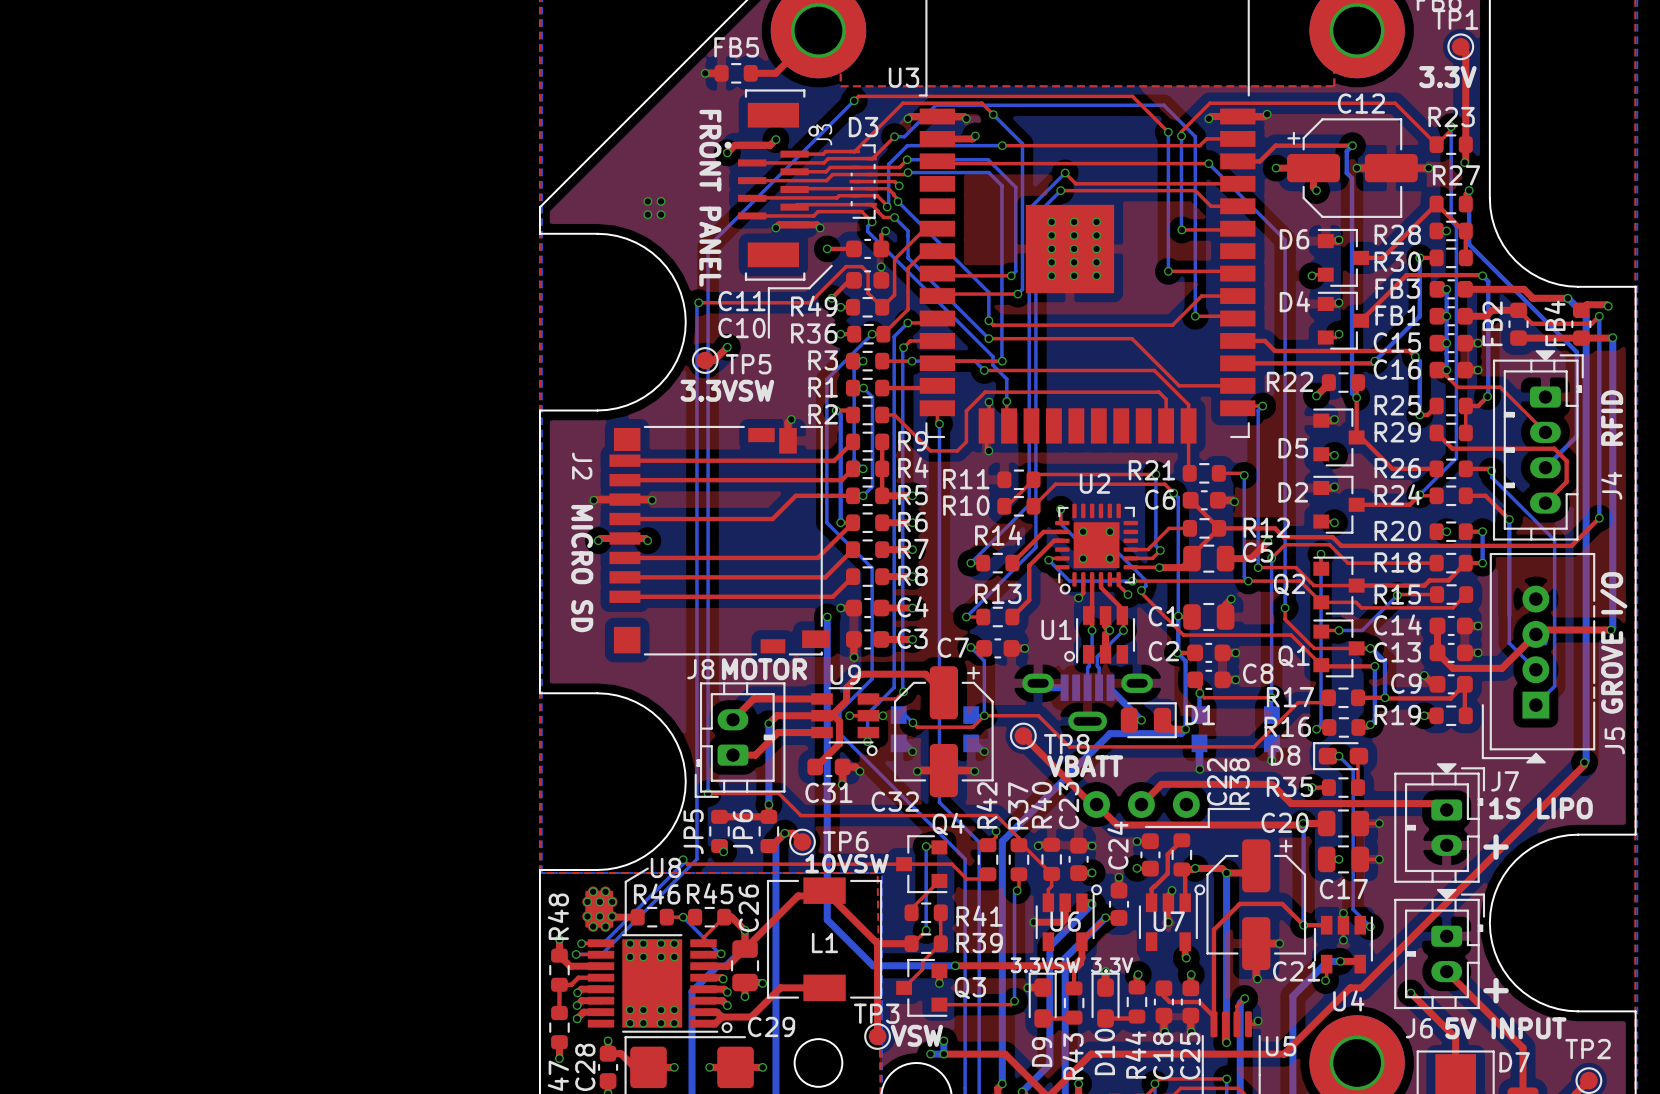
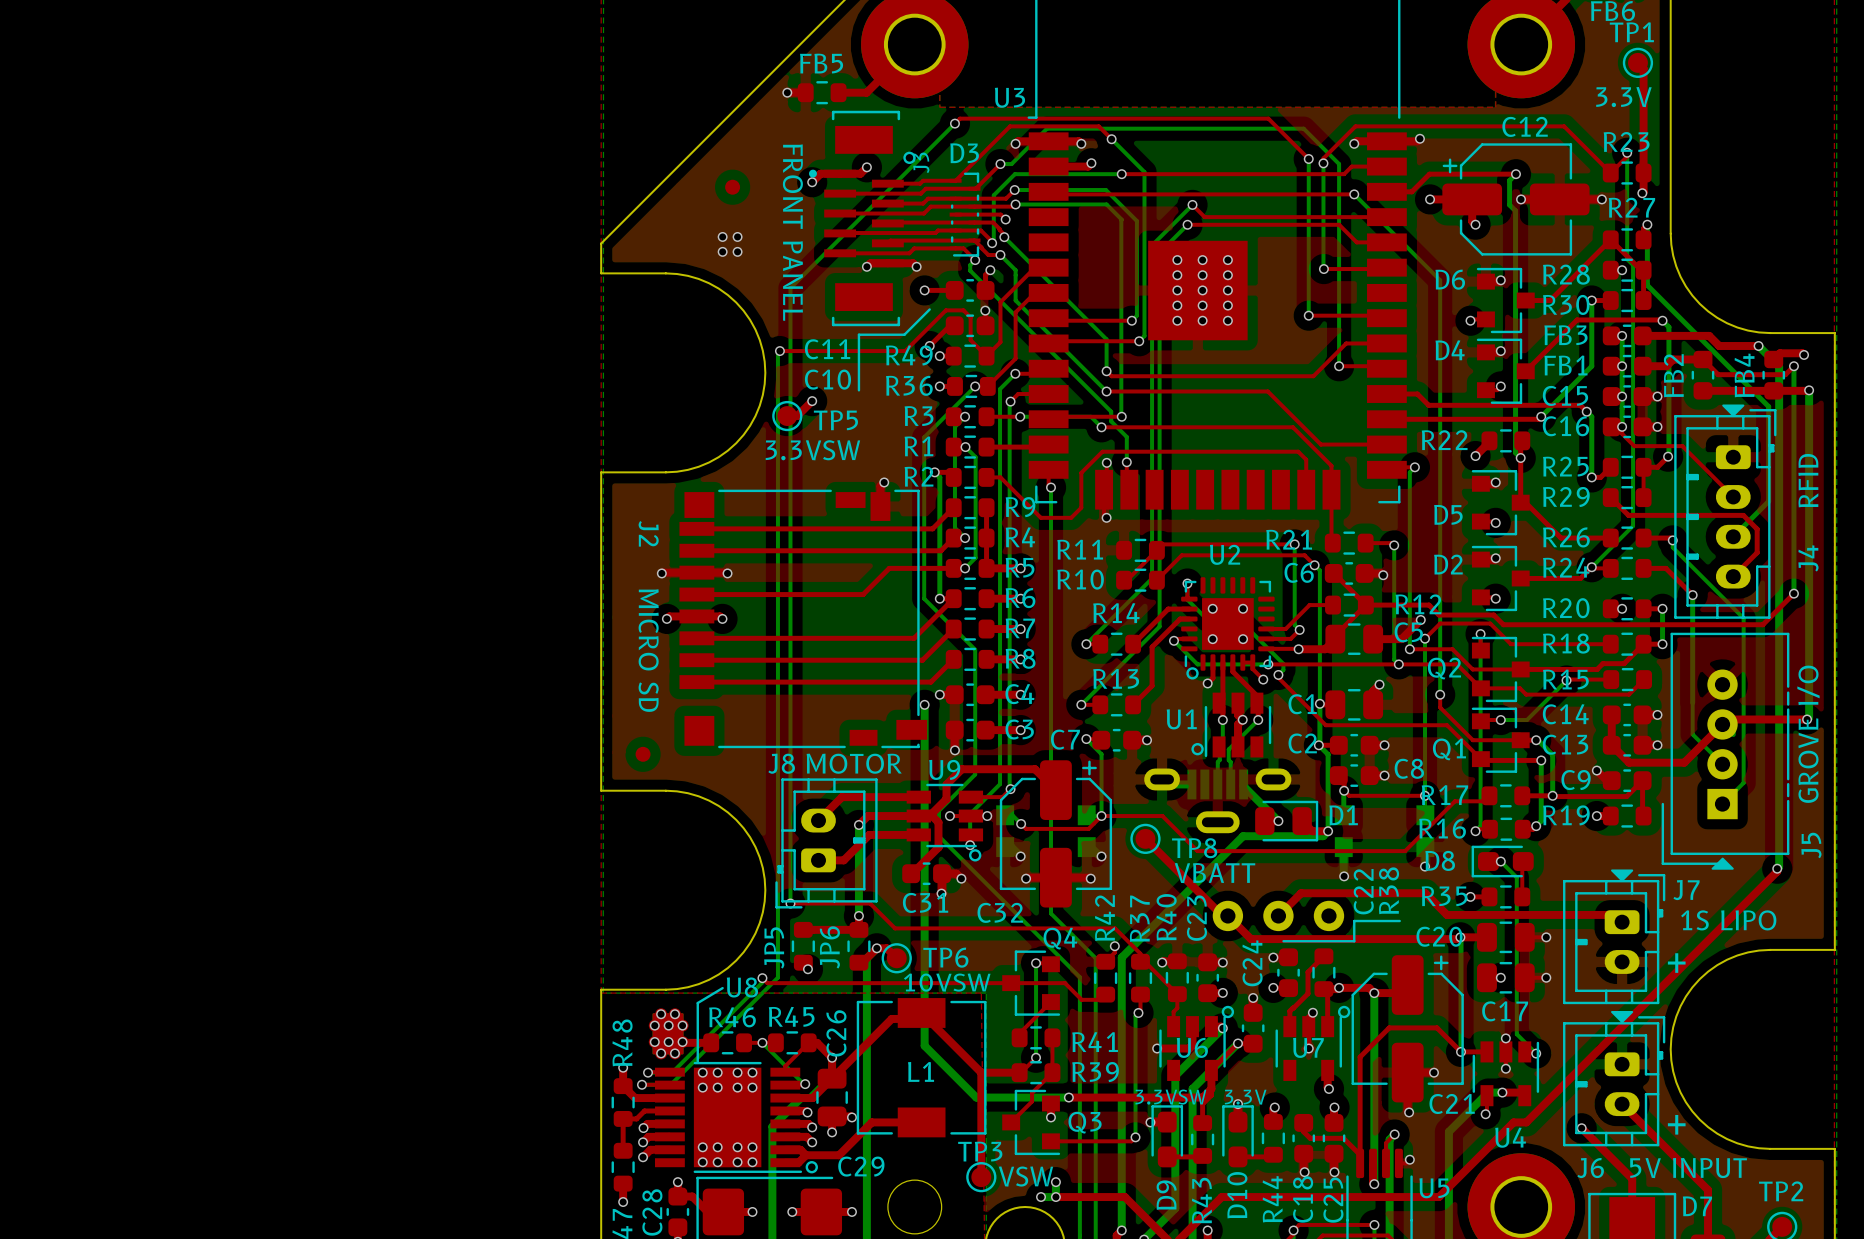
part: none -> (732, 187)
part: none -> (643, 754)

